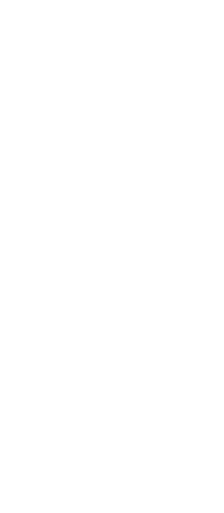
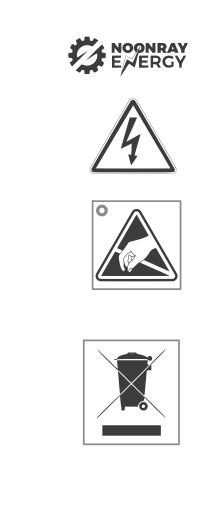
drawing: none -> [68, 36, 188, 77]
drawing: none -> [89, 98, 177, 175]
drawing: none -> [91, 200, 182, 290]
drawing: none -> [82, 339, 180, 446]

